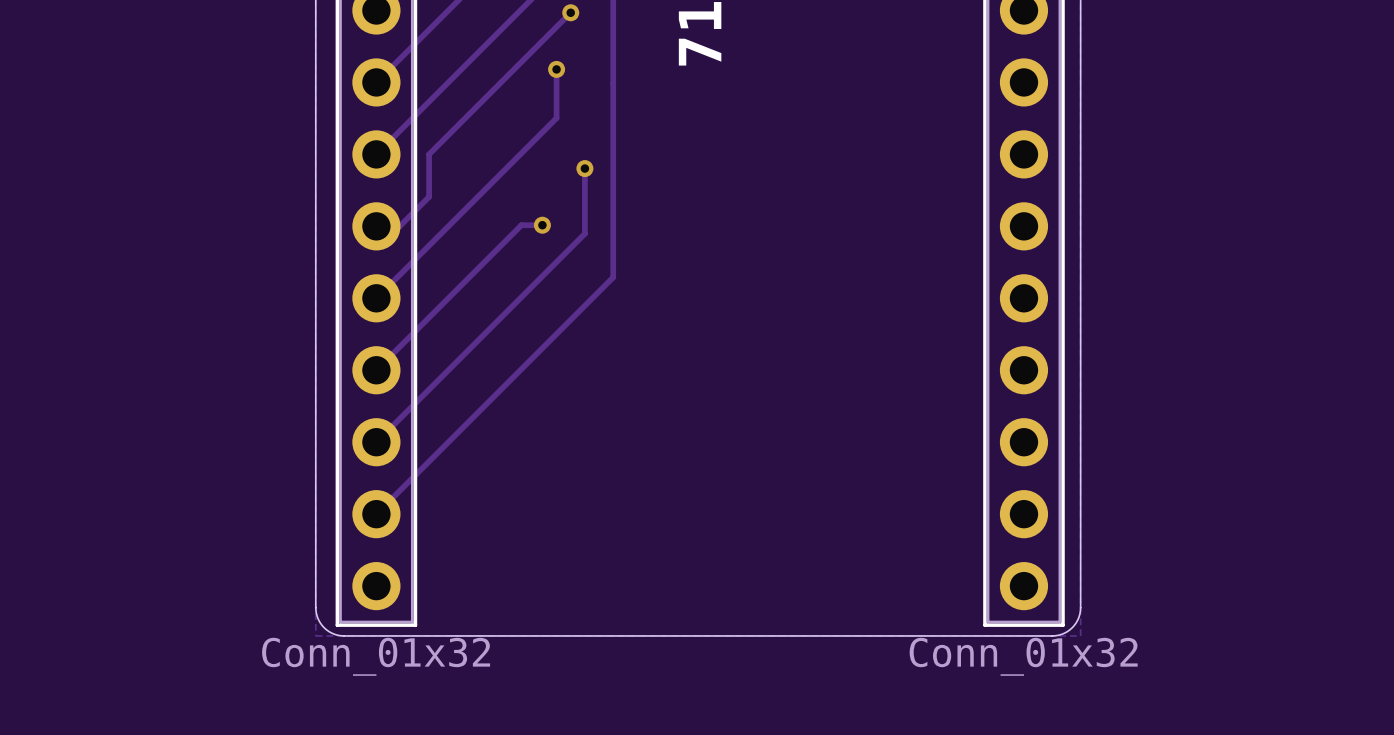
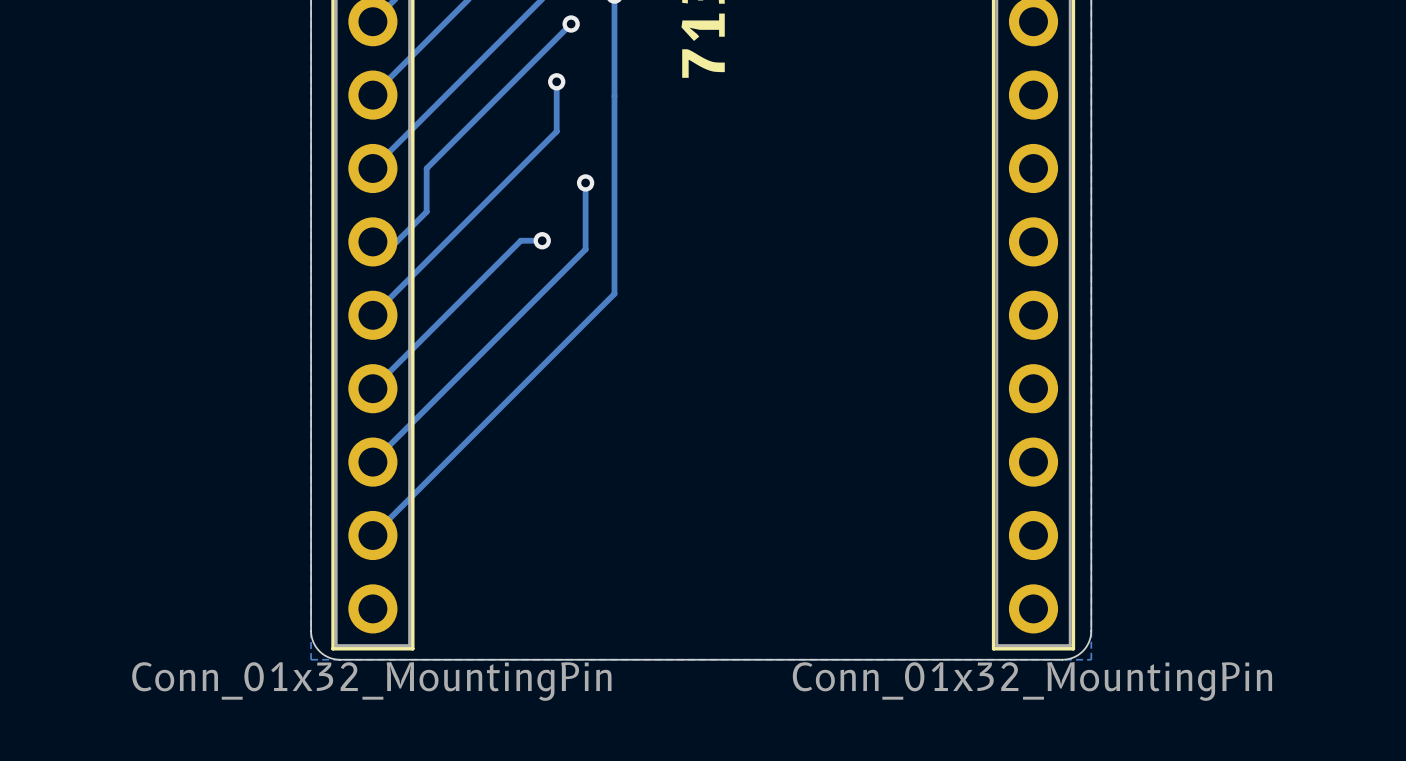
part value: Conn_01x32 (376, 656) -> Conn_01x32_MountingPin (371, 681)
part value: Conn_01x32 (1023, 656) -> Conn_01x32_MountingPin (1032, 681)

